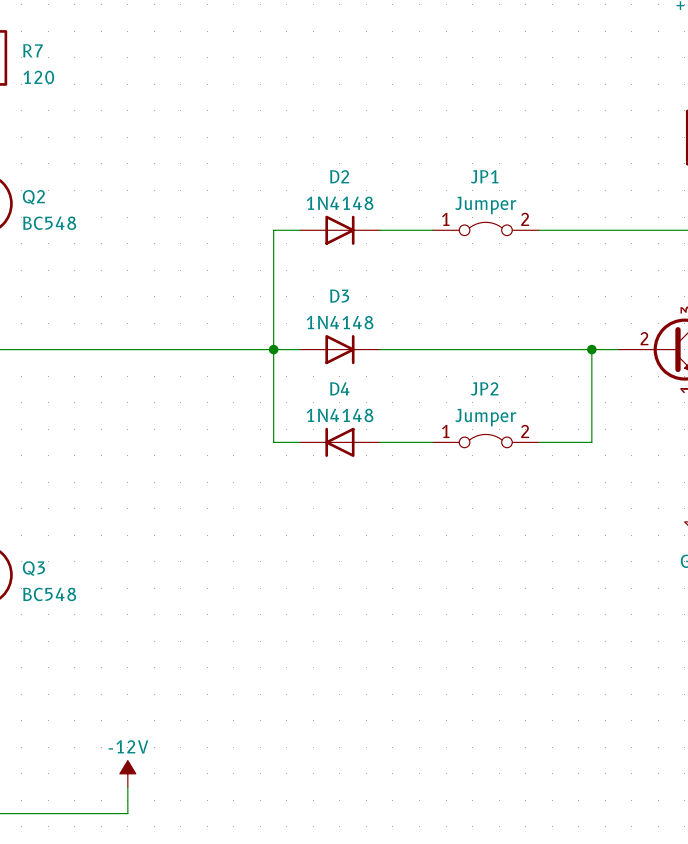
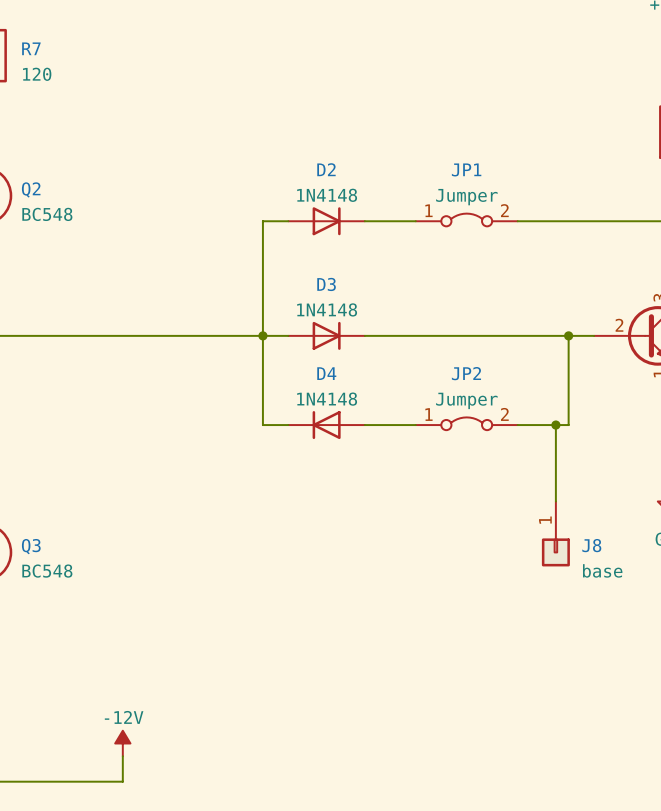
wire: none -> (555, 425) (555, 501)
junction: none -> (555, 425)
J8: none -> base (555, 533)

